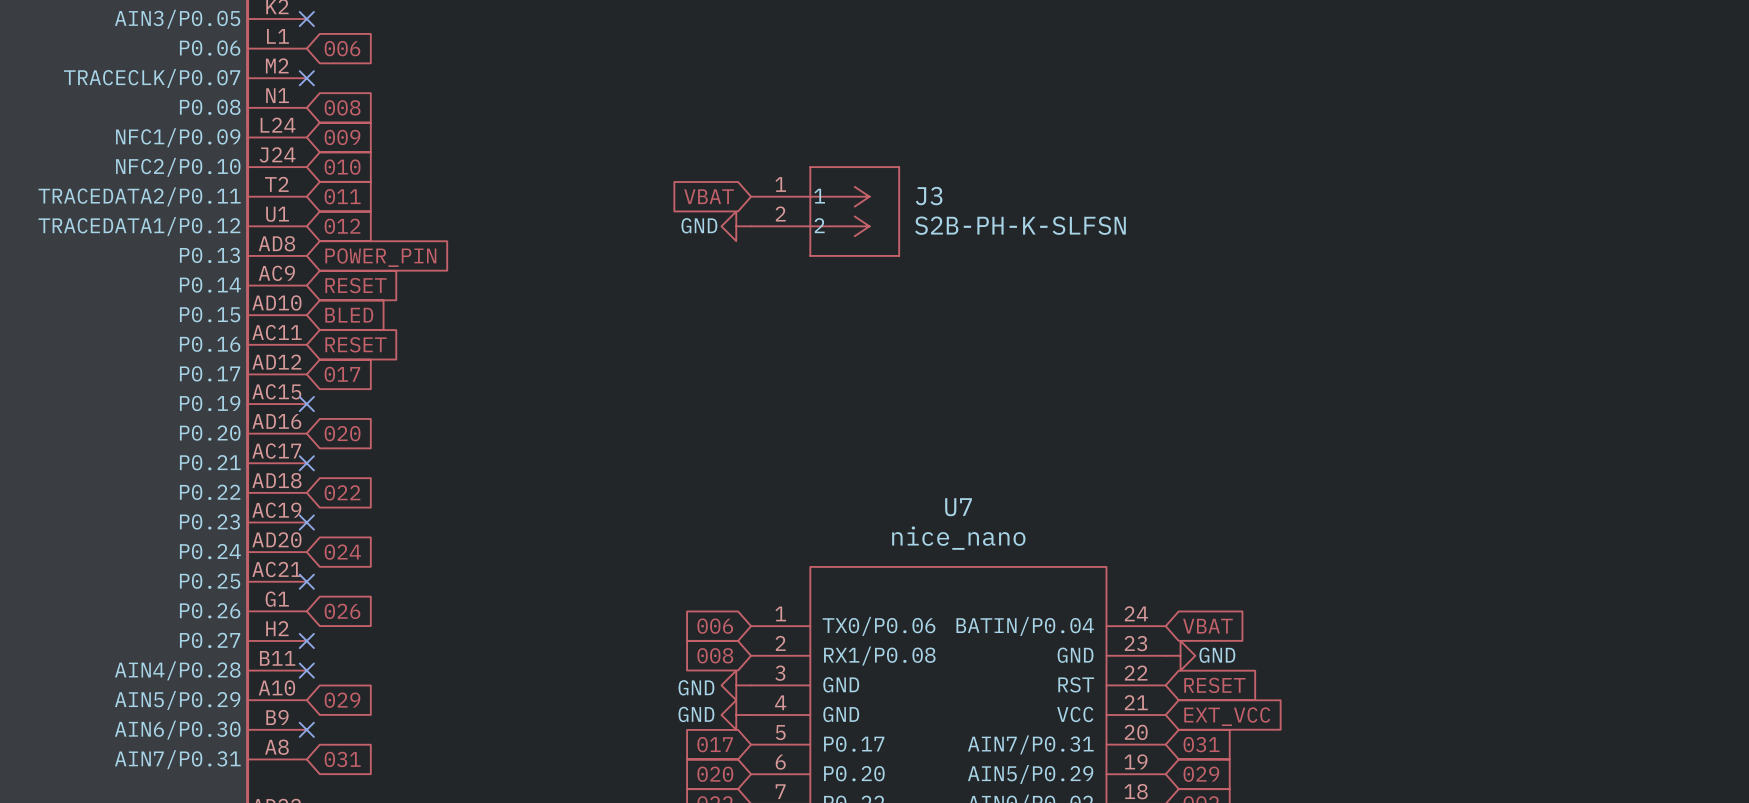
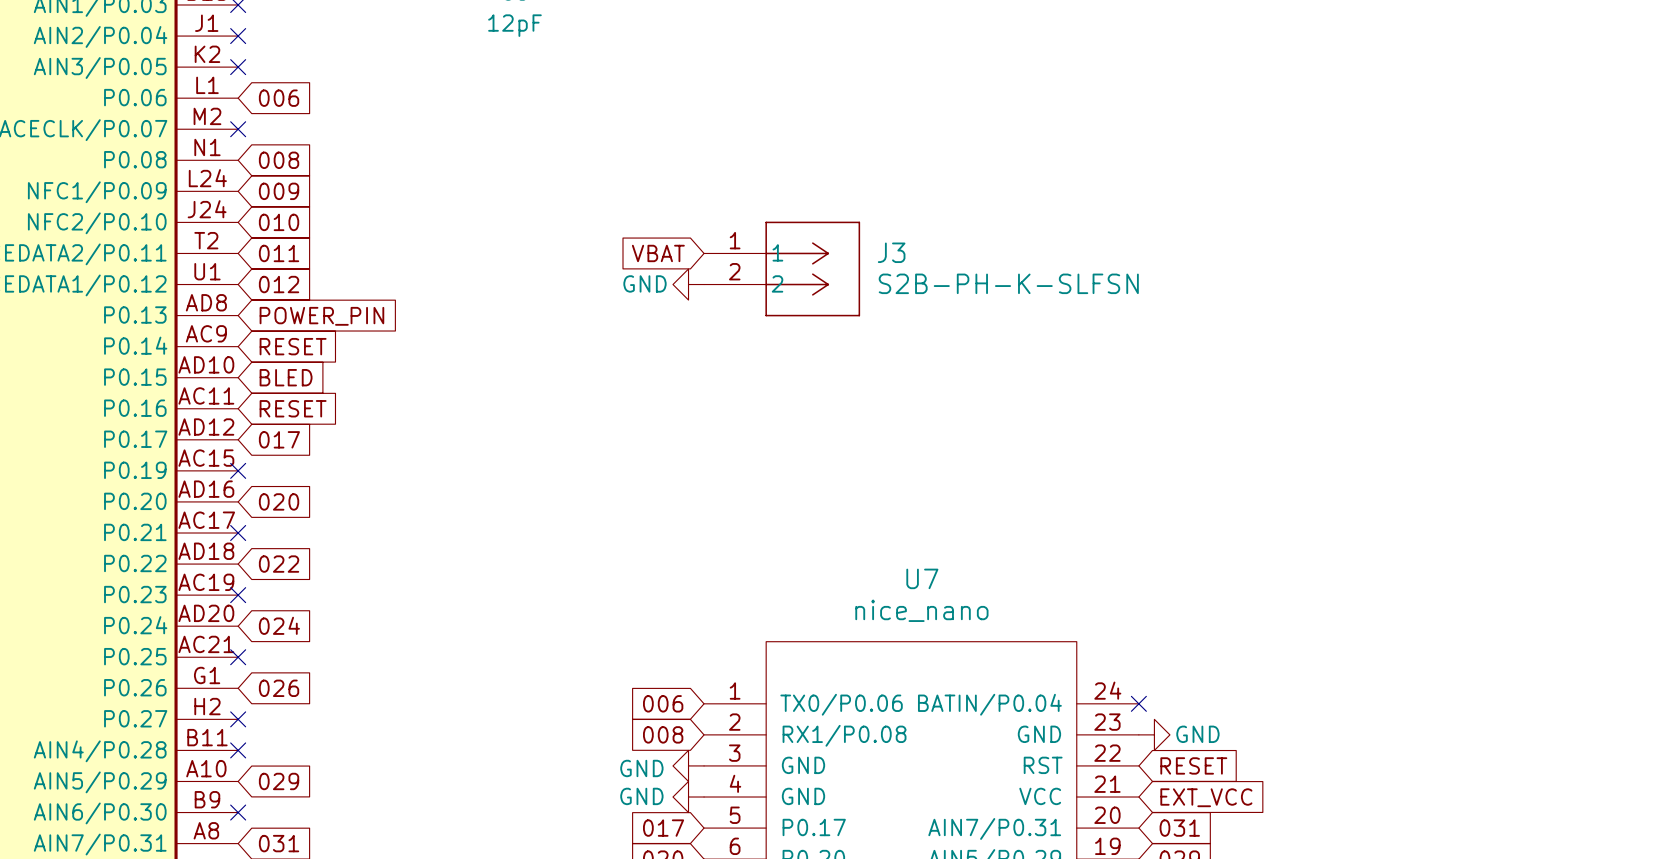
no-connect mark: none -> (1138, 703)
global label: VBAT (1207, 626) -> none

